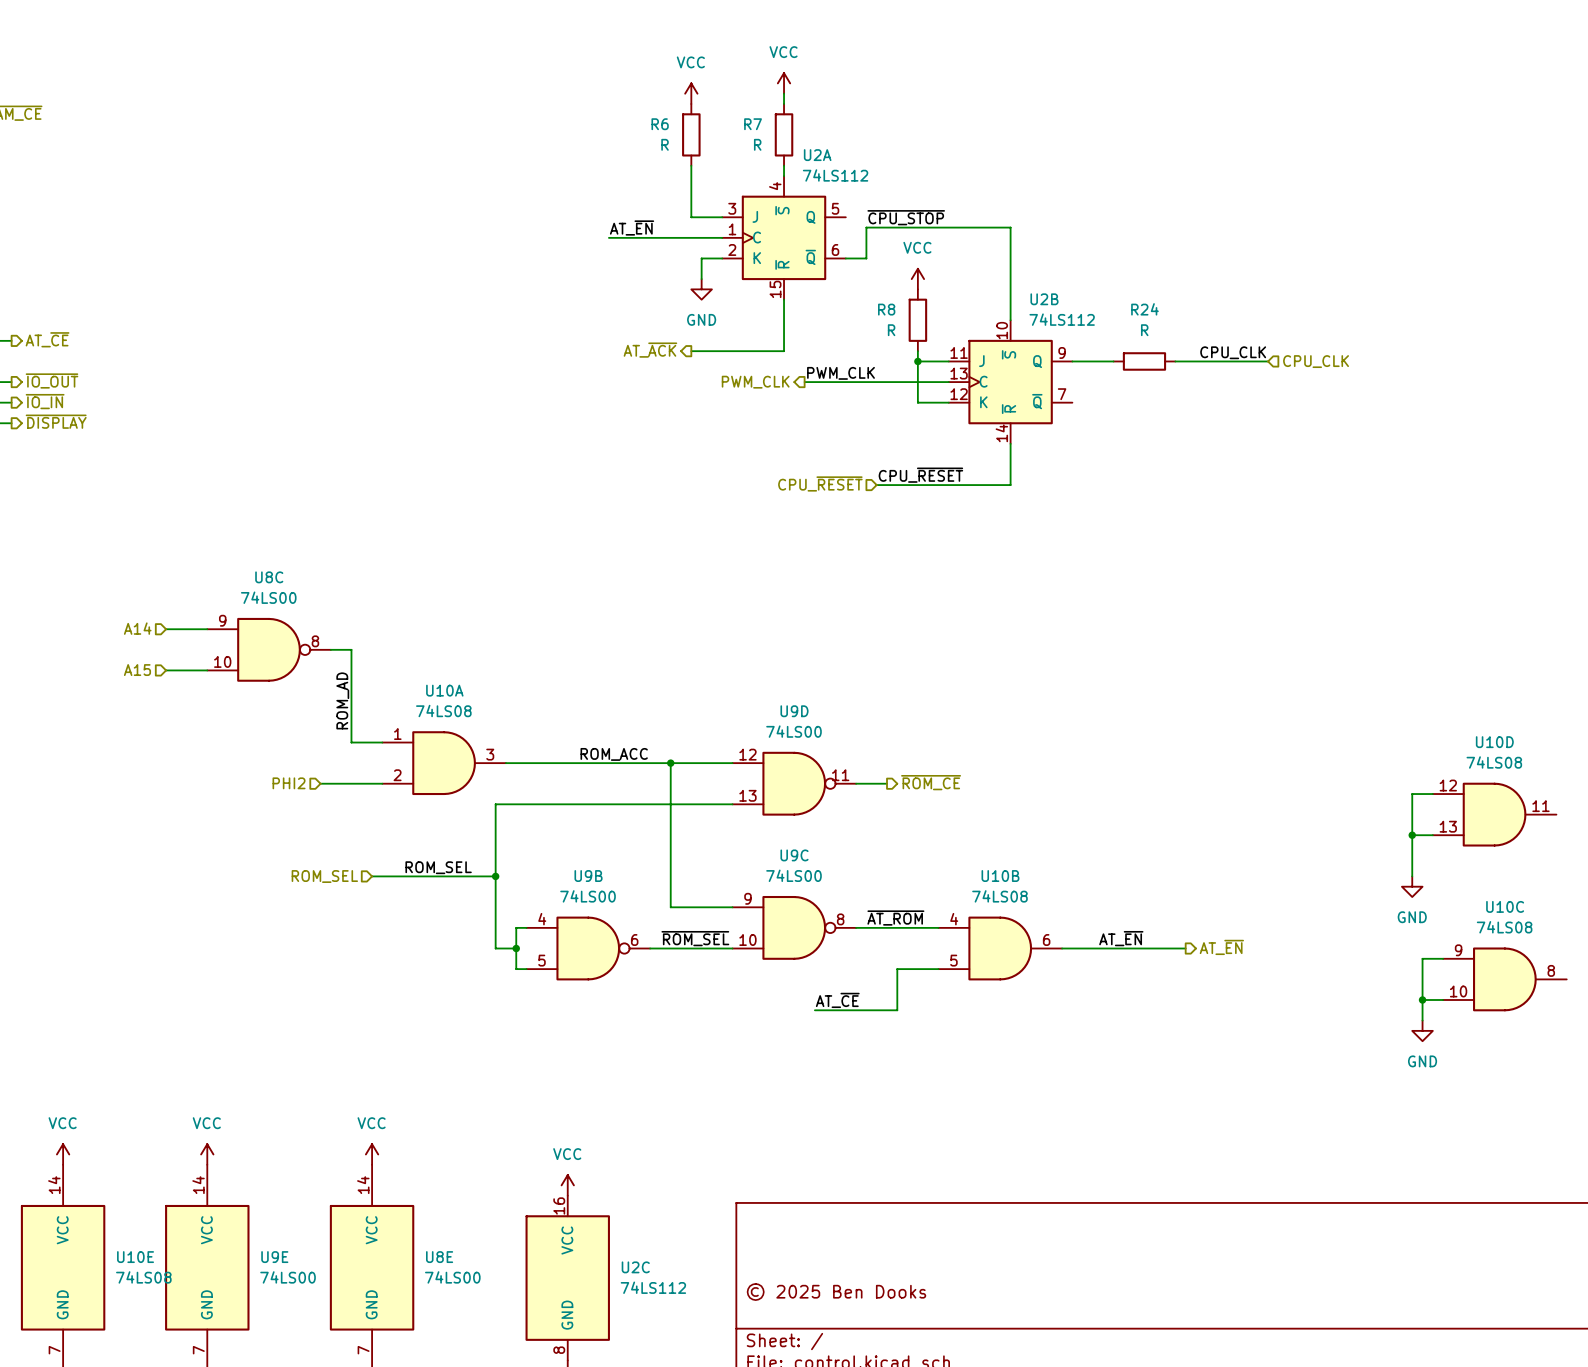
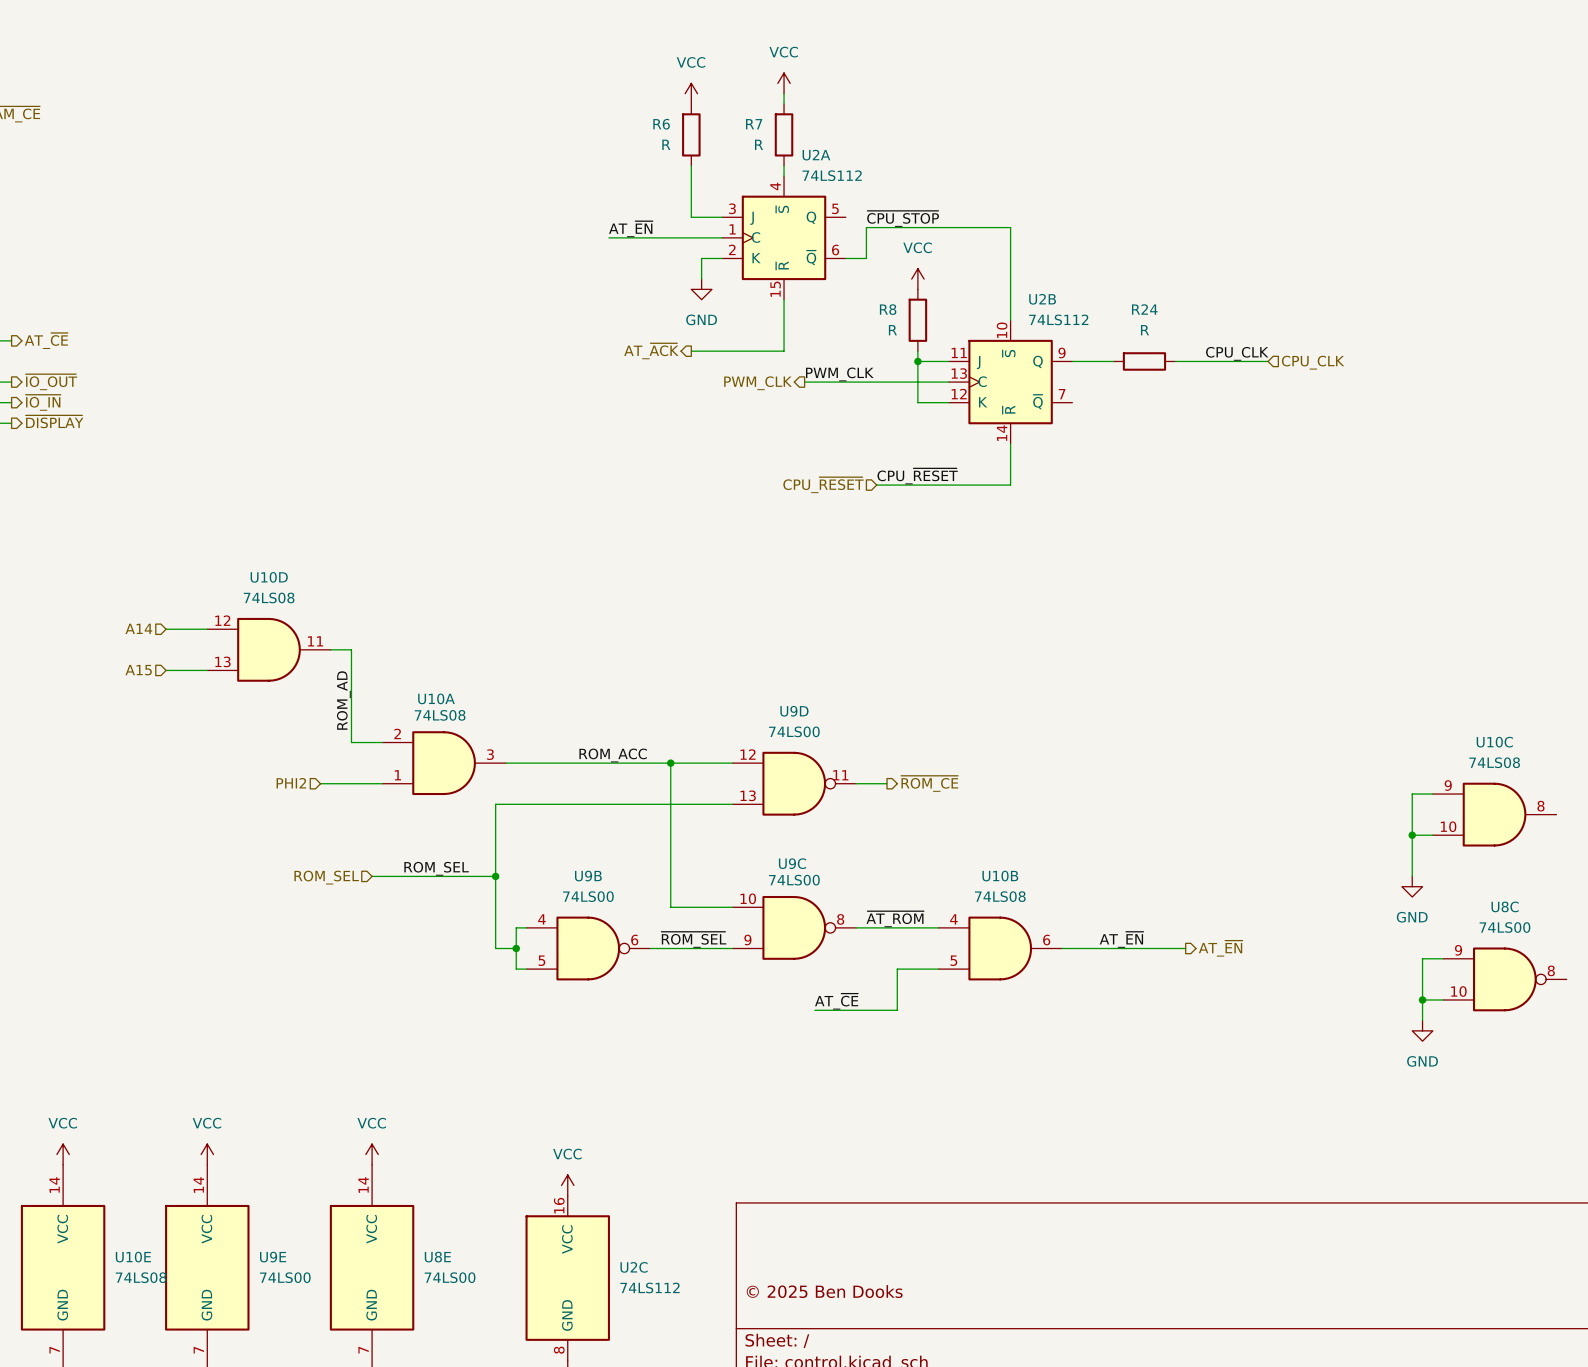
U8C position: (269, 649) -> (1504, 979)
U10A flip: as is (444, 763) -> up-down (444, 763)
U10D position: (1494, 814) -> (269, 649)
U9C flip: as is (794, 927) -> up-down (794, 927)
U10C position: (1504, 979) -> (1494, 814)

